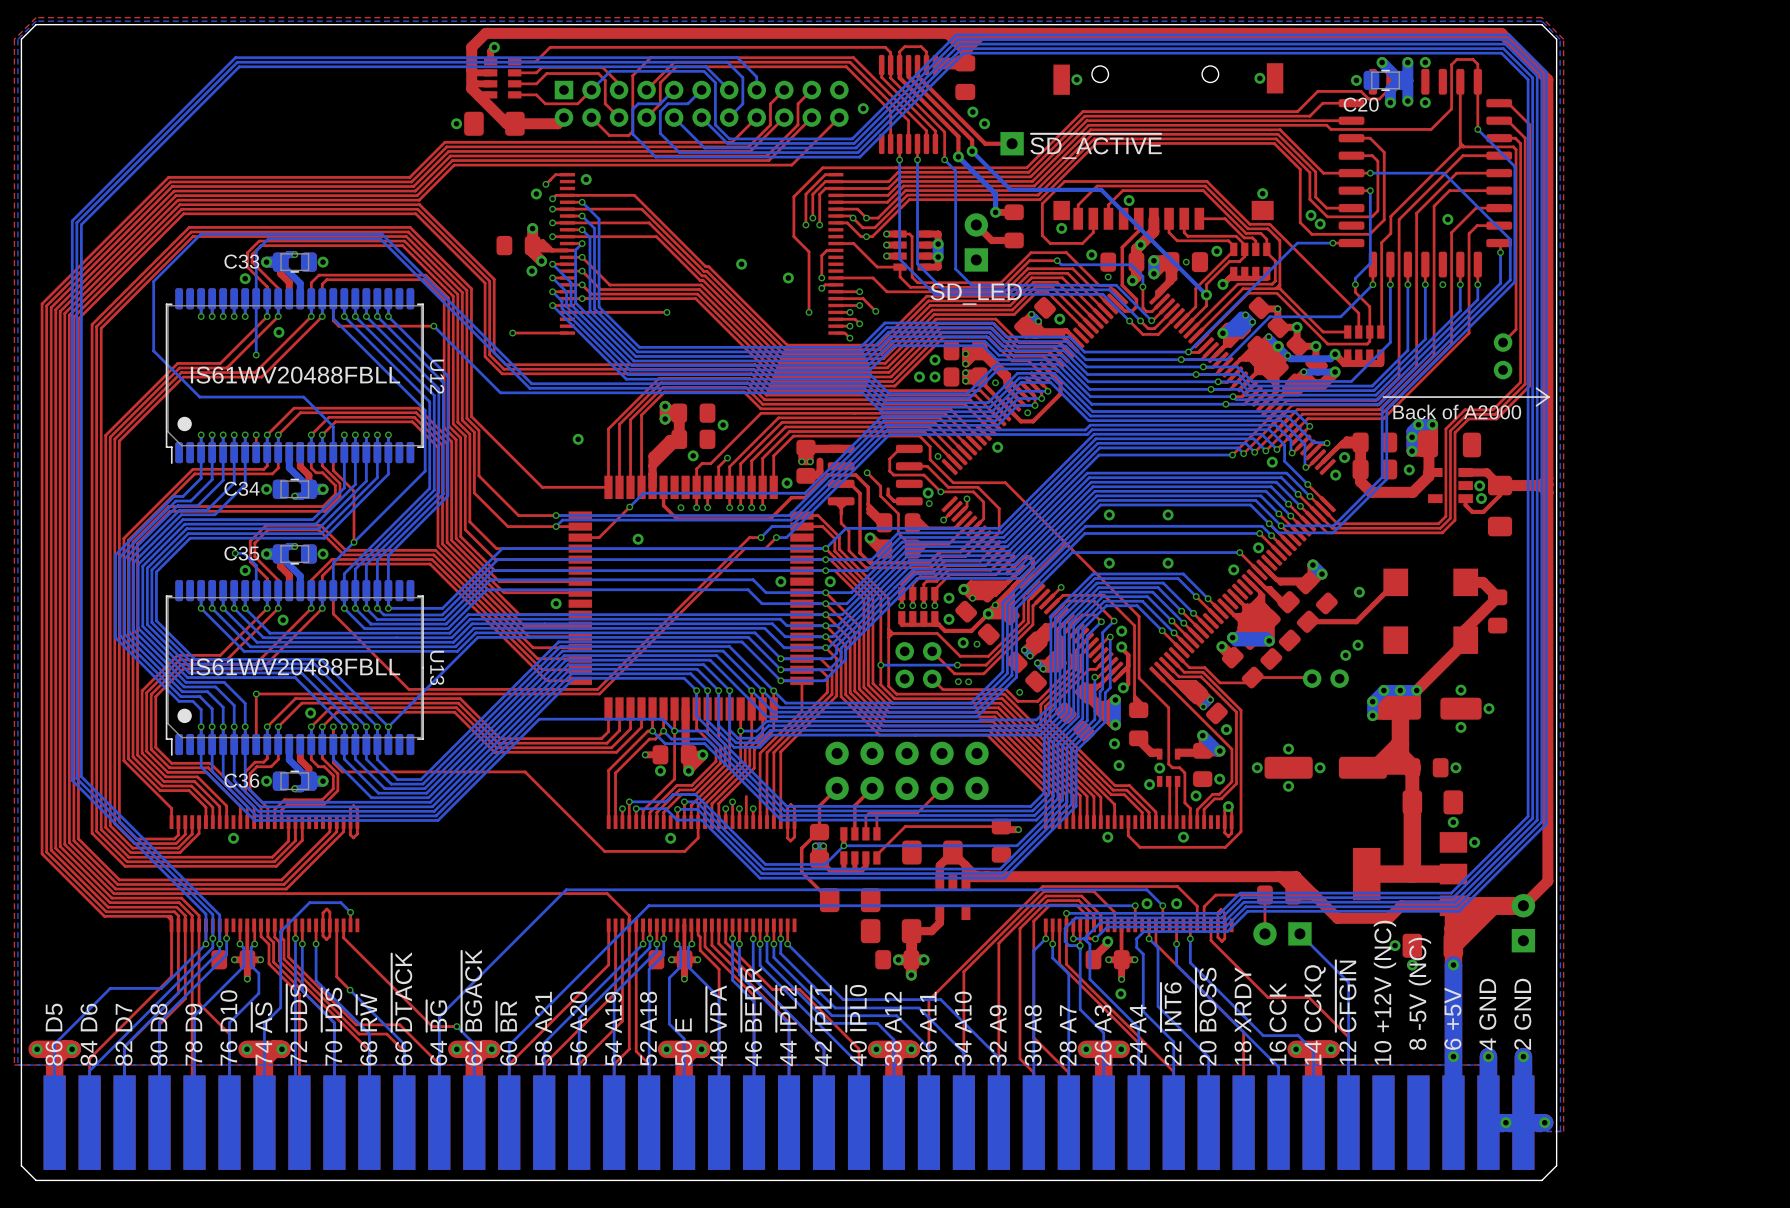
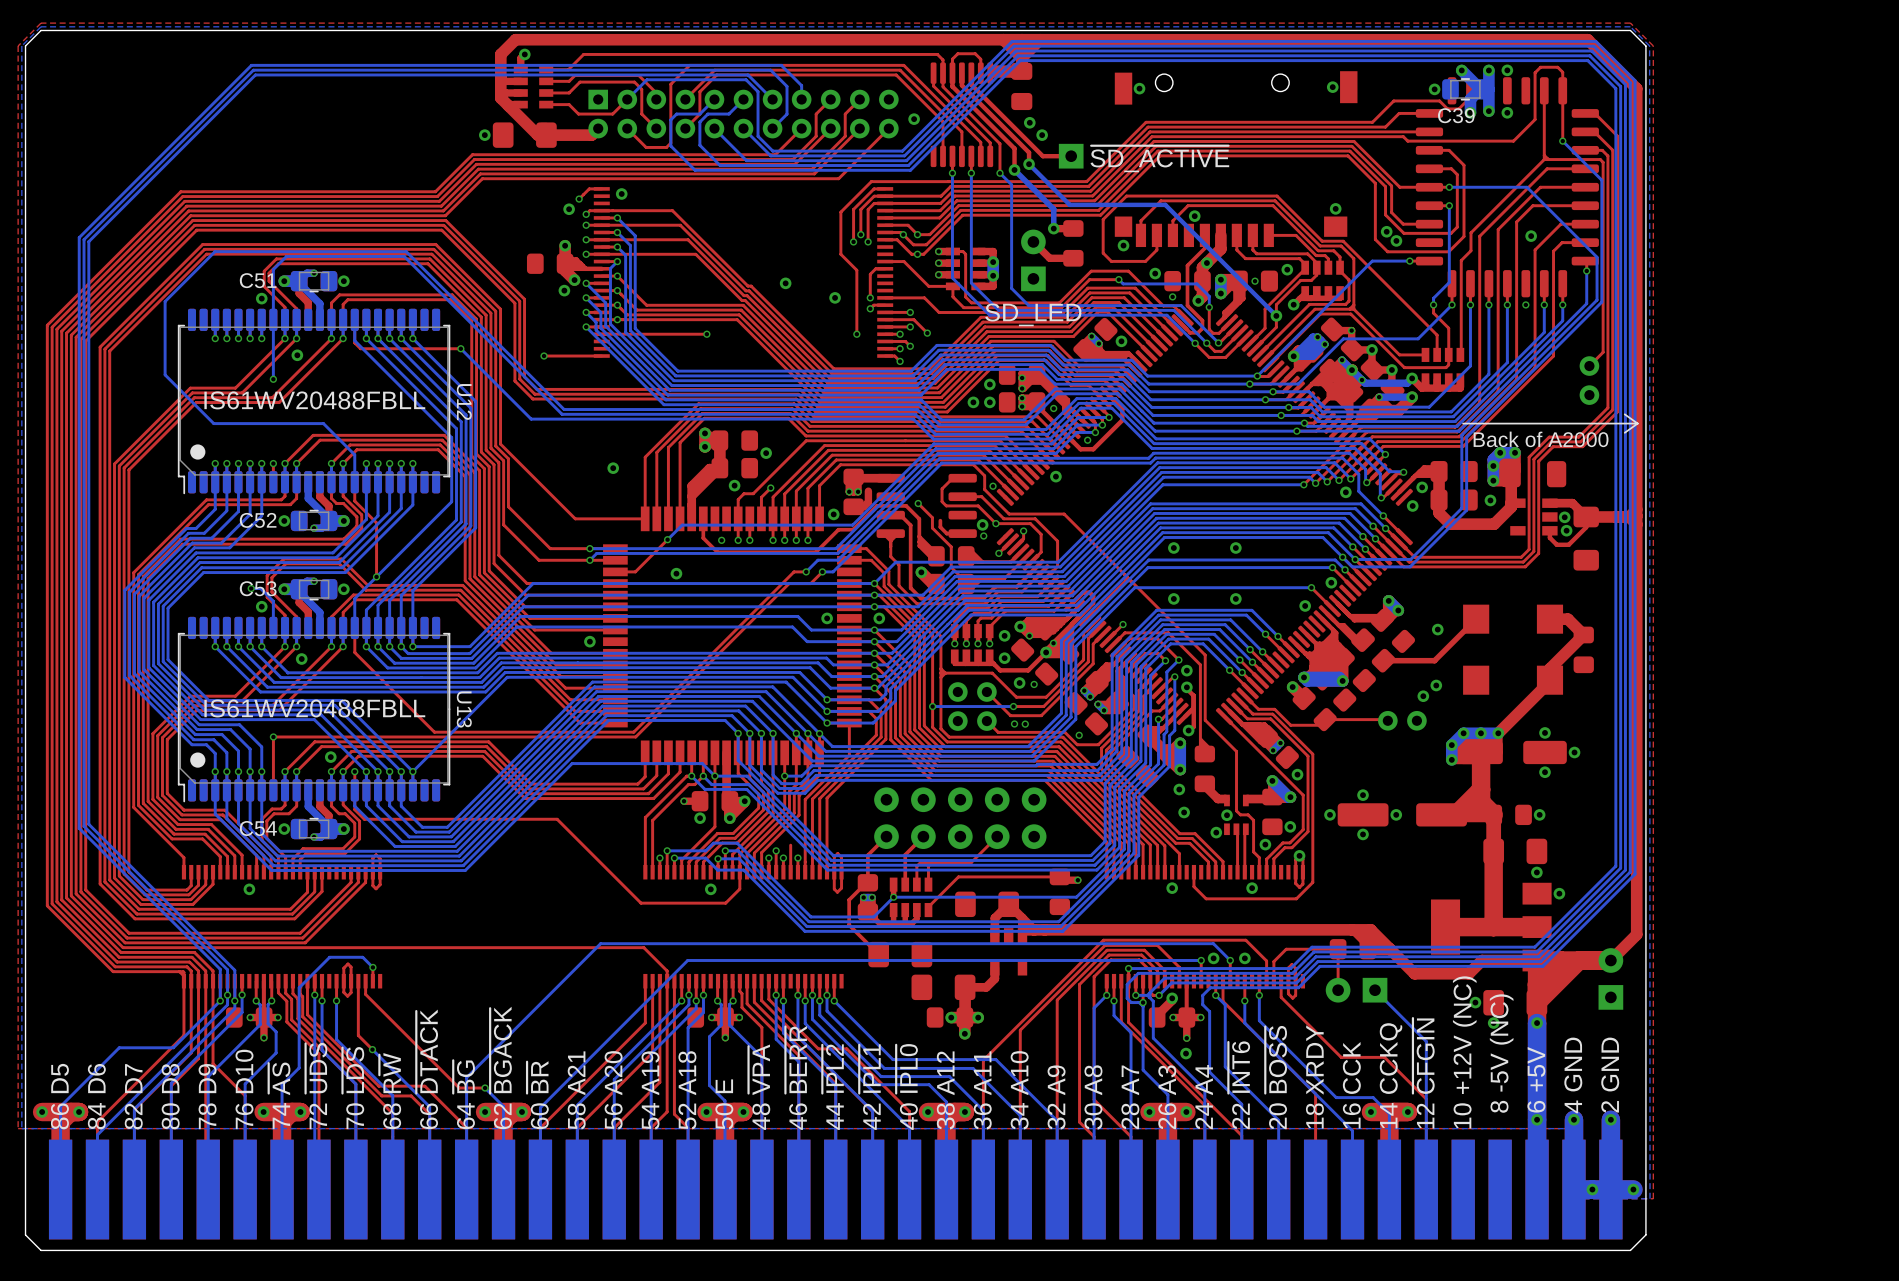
C20 name: C20 (1361, 104) -> C39 (1456, 115)
C33 name: C33 (241, 261) -> C51 (258, 280)
C34 name: C34 (242, 488) -> C52 (258, 520)
C35 name: C35 (241, 553) -> C53 (258, 588)
C36 name: C36 (241, 780) -> C54 (258, 828)

